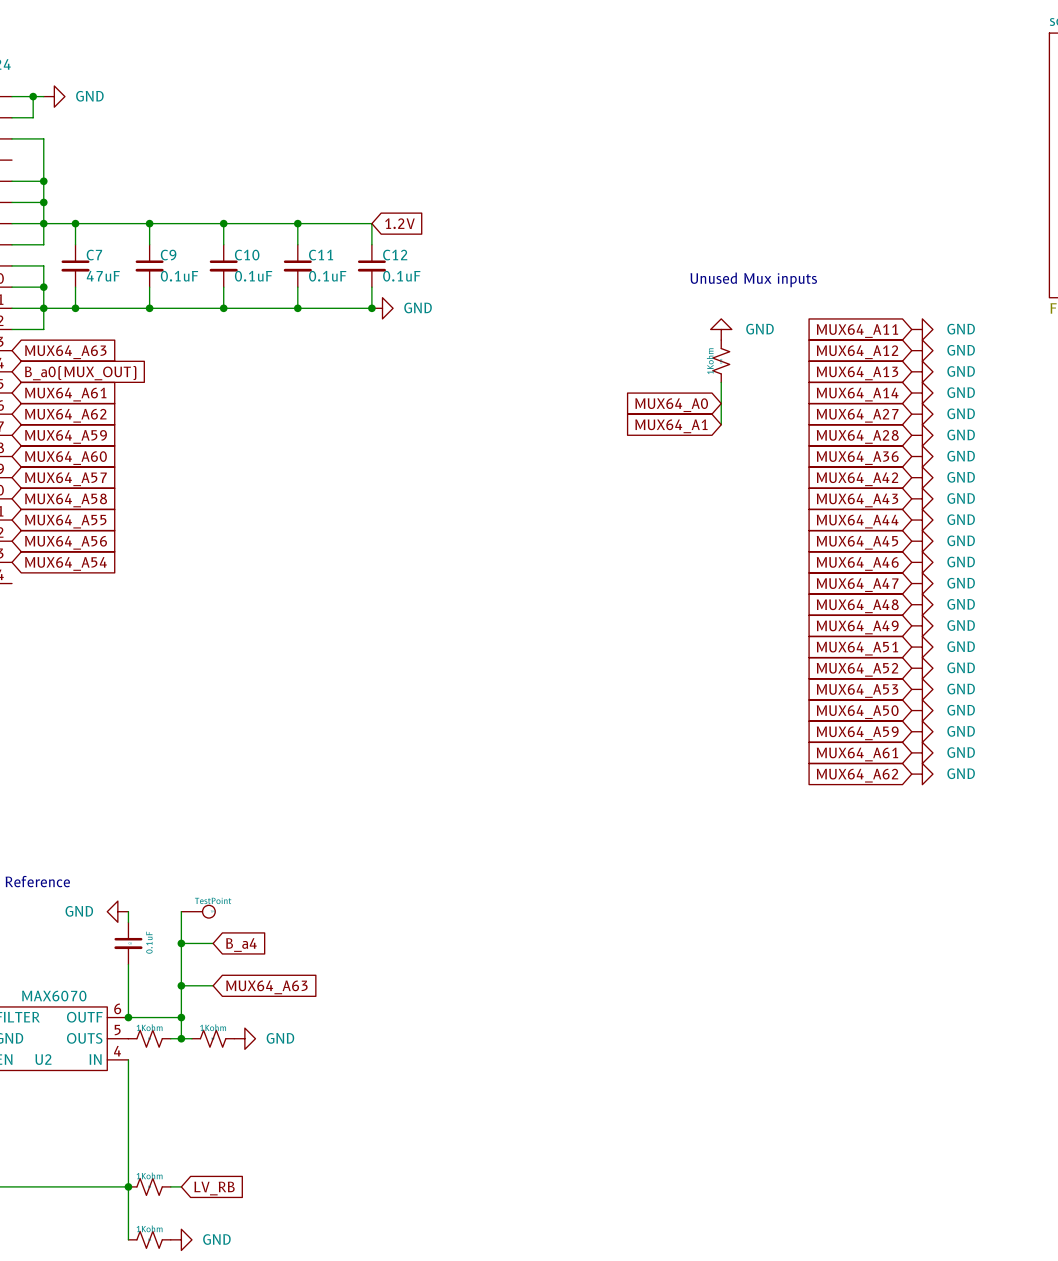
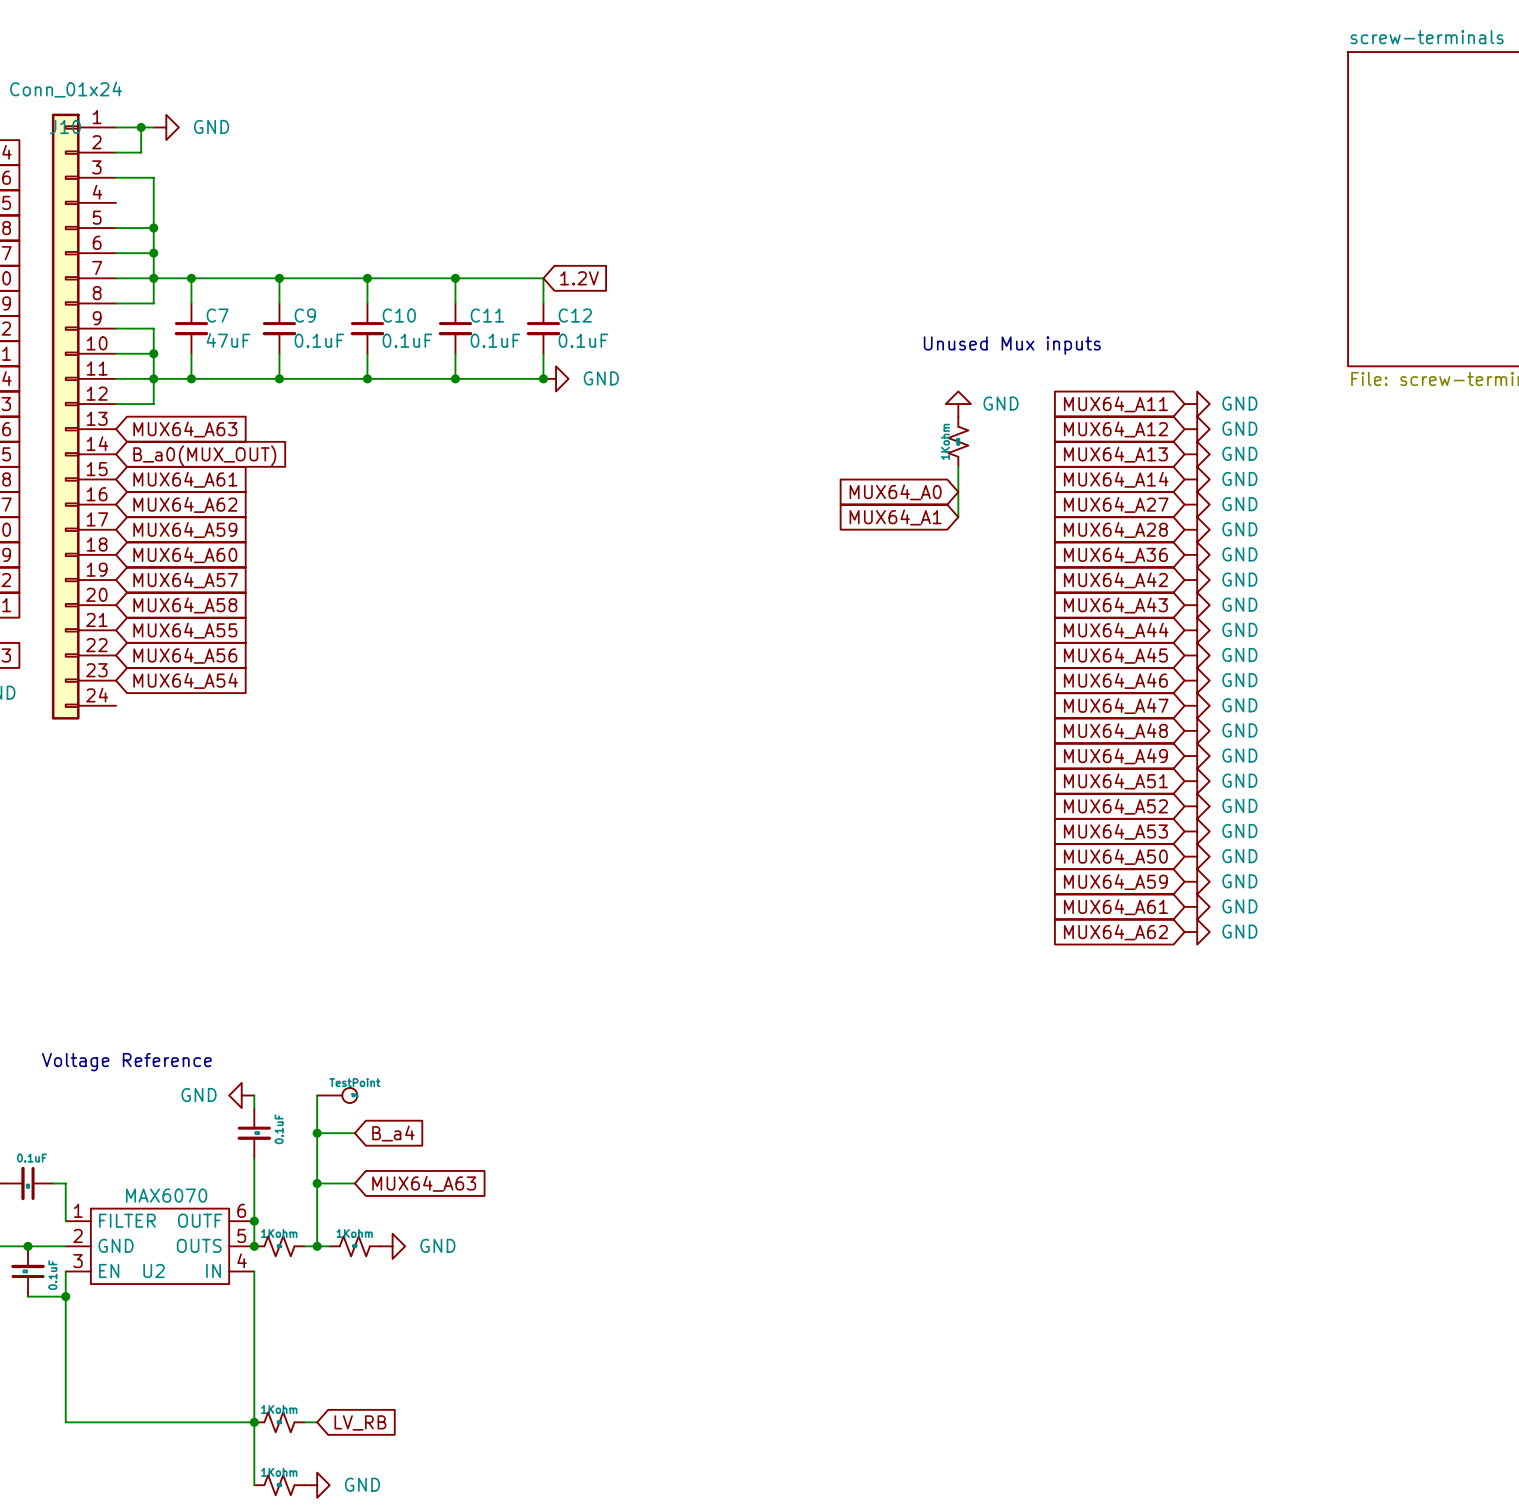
wire: (128, 1017) (181, 1017) -> (254, 1221) (254, 1246)
junction: (181, 1017) -> none
junction: none -> (254, 1246)

